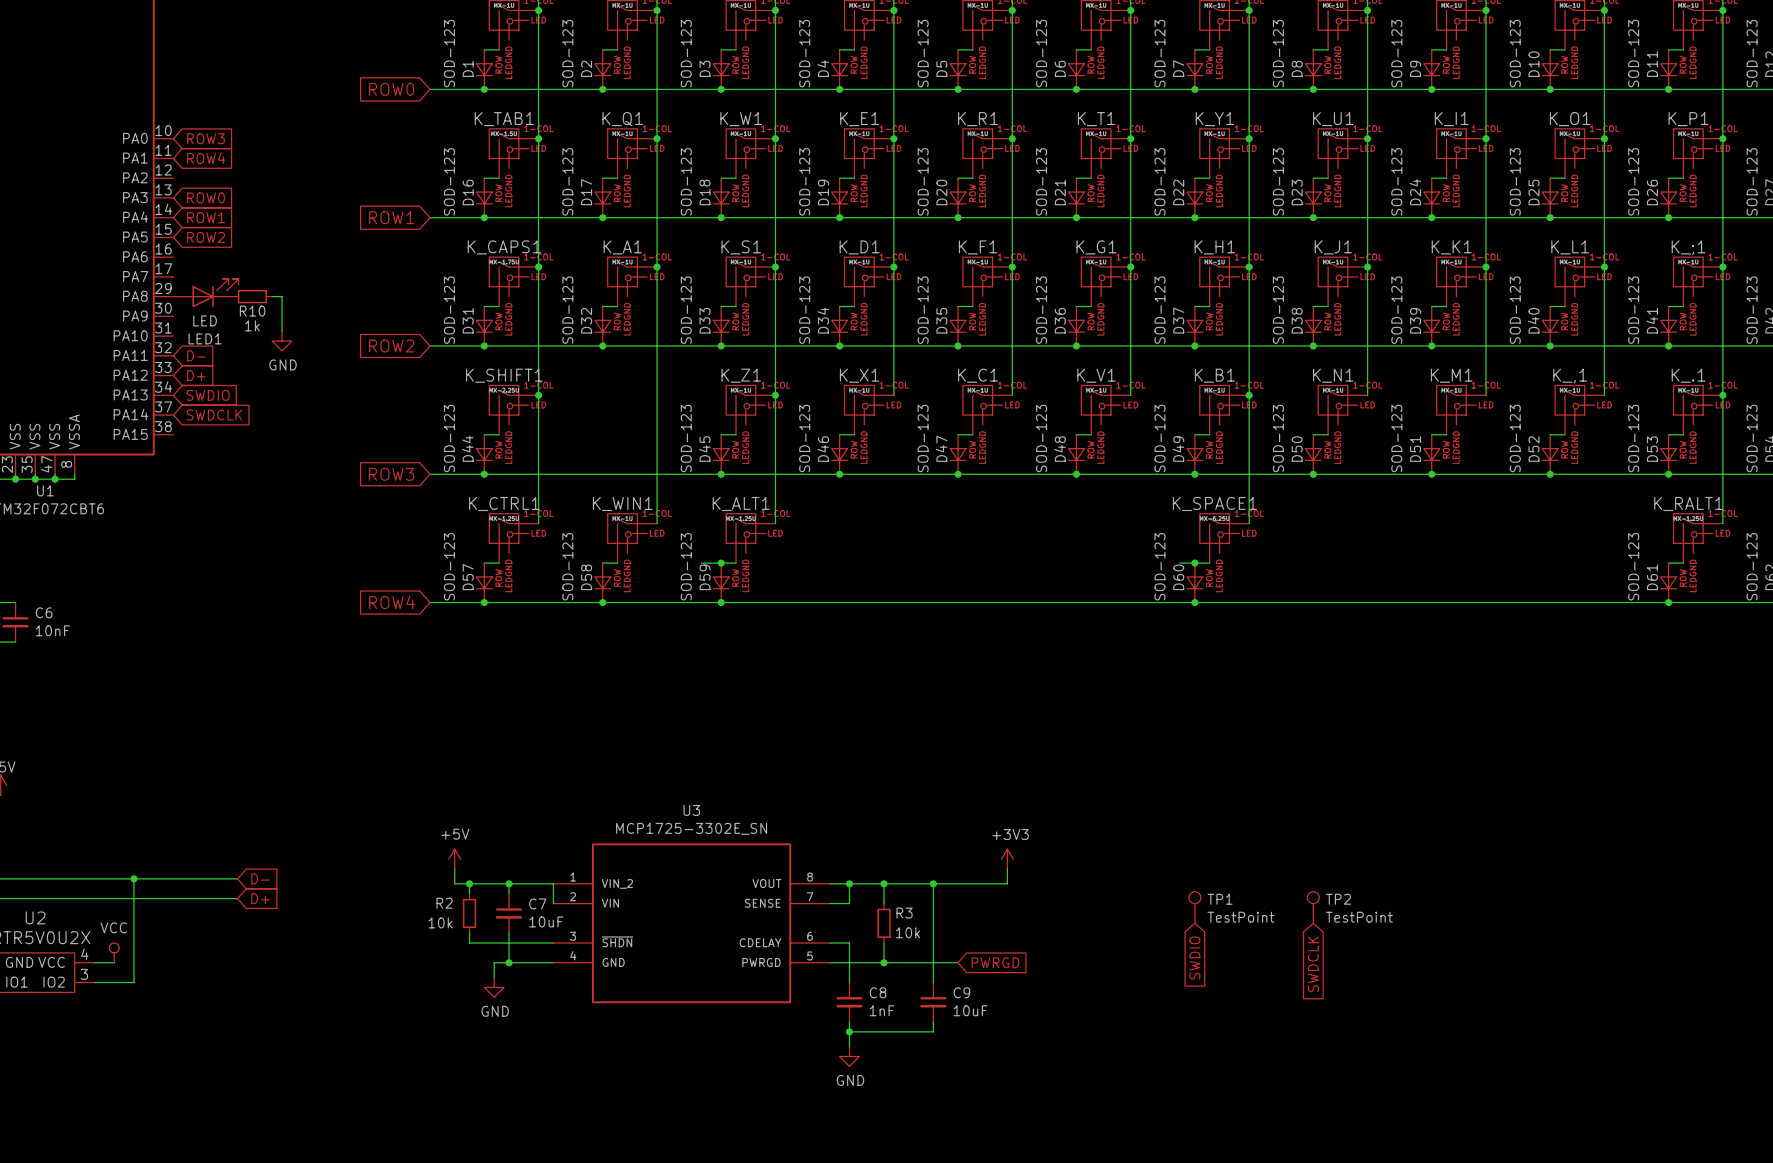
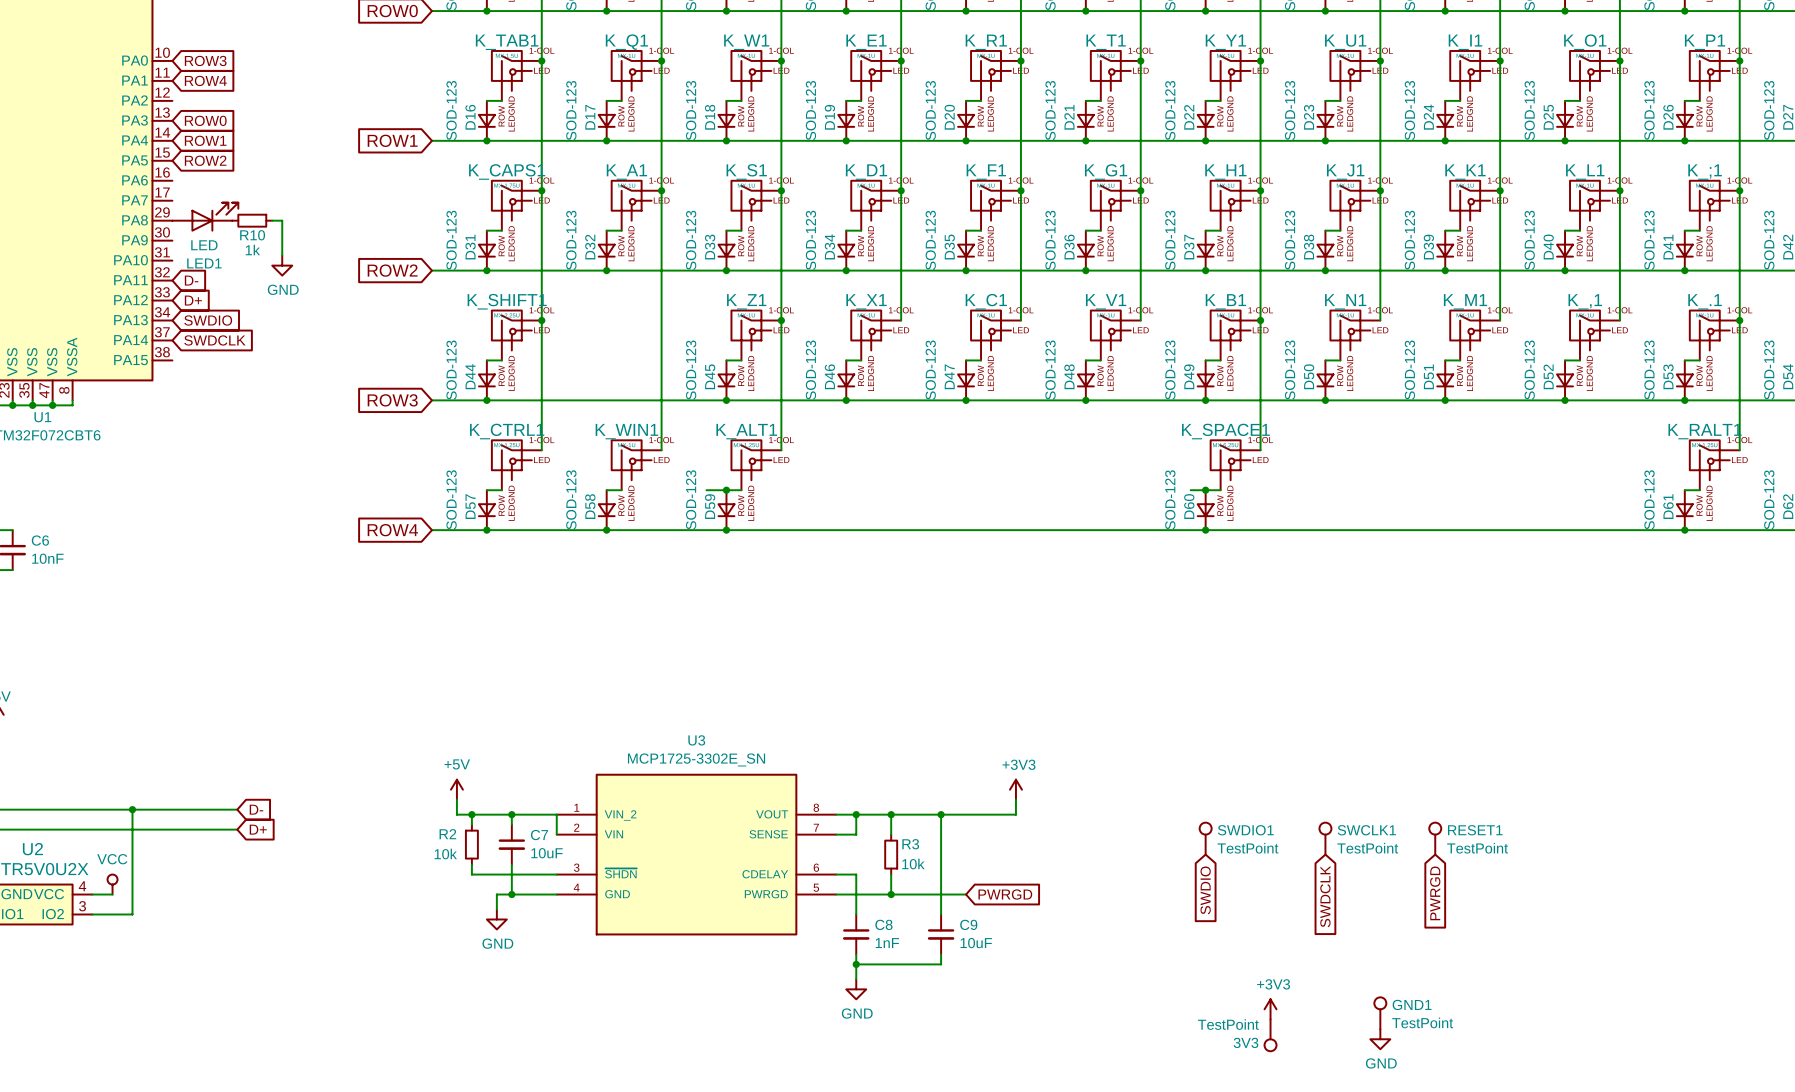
TP1 name: TP1 (1220, 899) -> SWDIO1 (1245, 830)
TP2 name: TP2 (1338, 899) -> SWCLK1 (1366, 830)
RESET1: none -> TestPoint (1435, 838)
global label: none -> PWRGD (1435, 893)
power symbol: none -> +3V3 (1270, 1009)
GND1: none -> TestPoint (1380, 1013)
3V3: none -> TestPoint (1270, 1035)
power symbol: none -> GND (1380, 1039)

